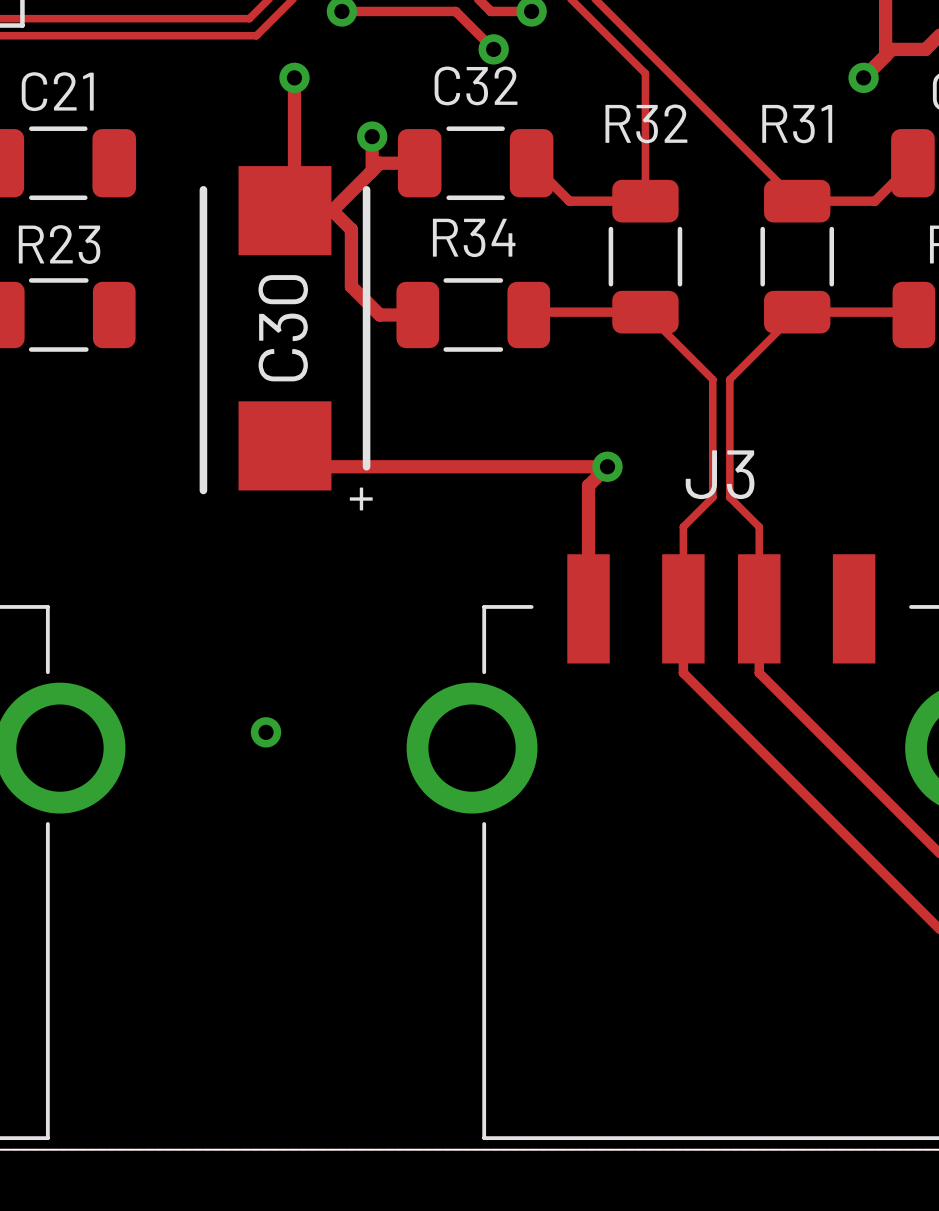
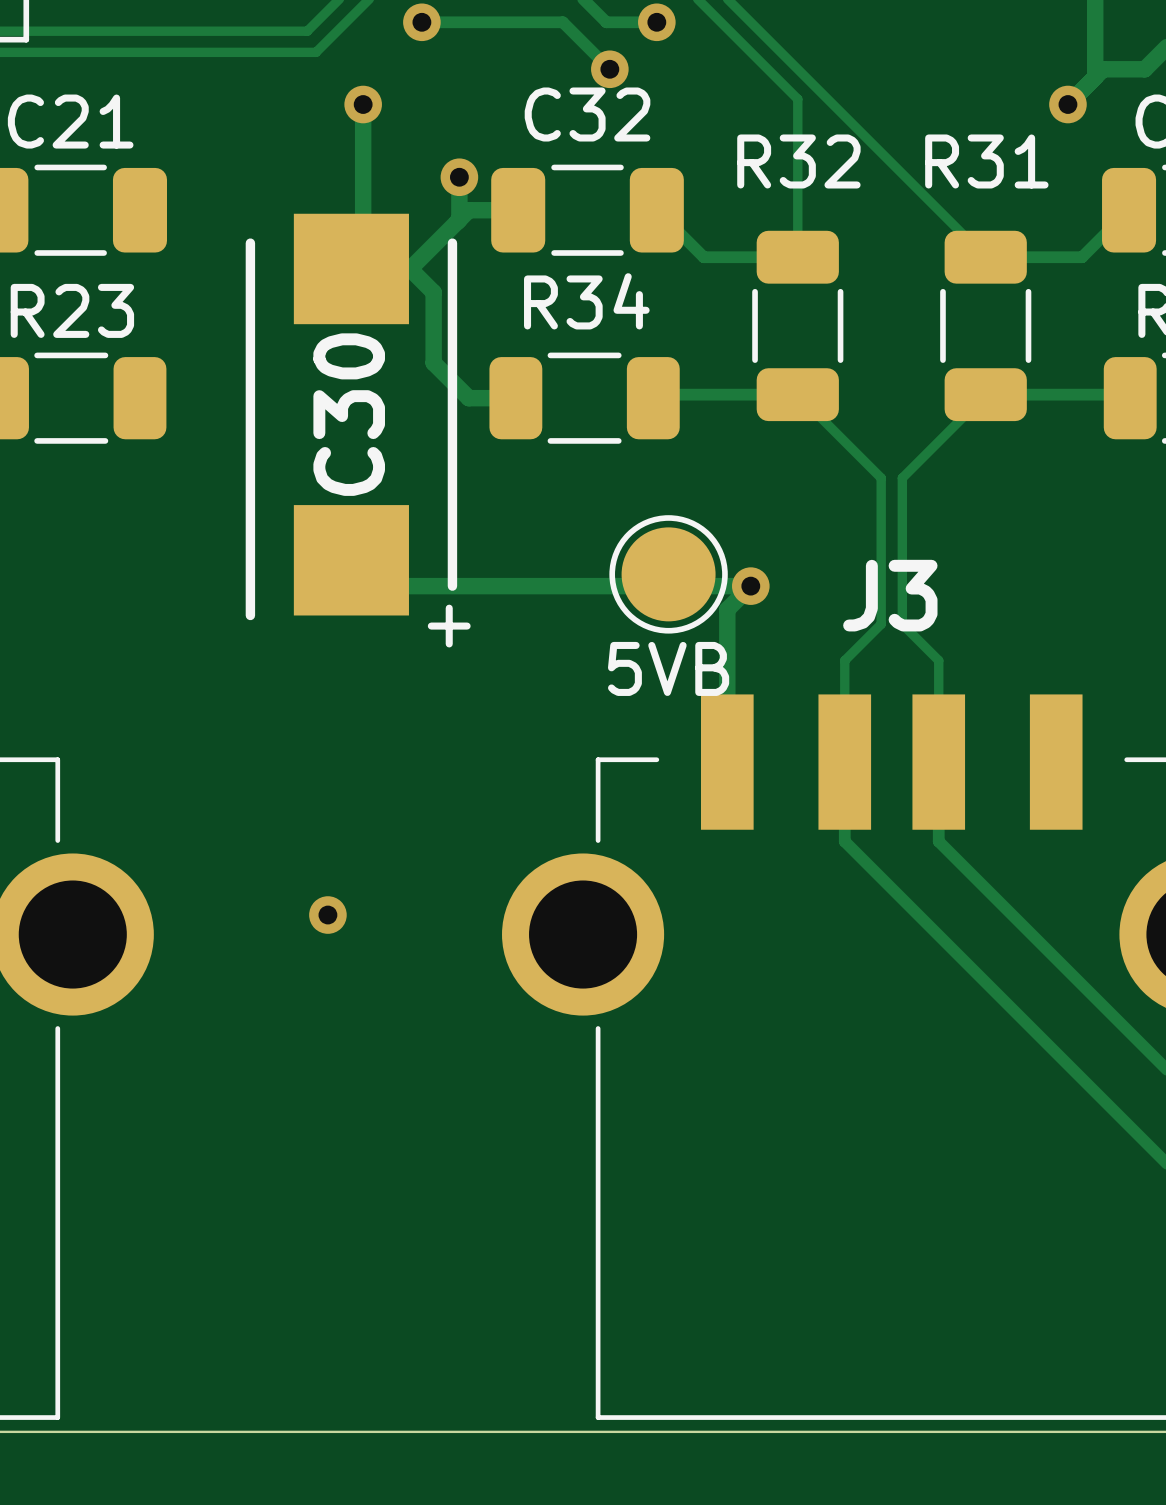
part: none -> 5VB (668, 574)

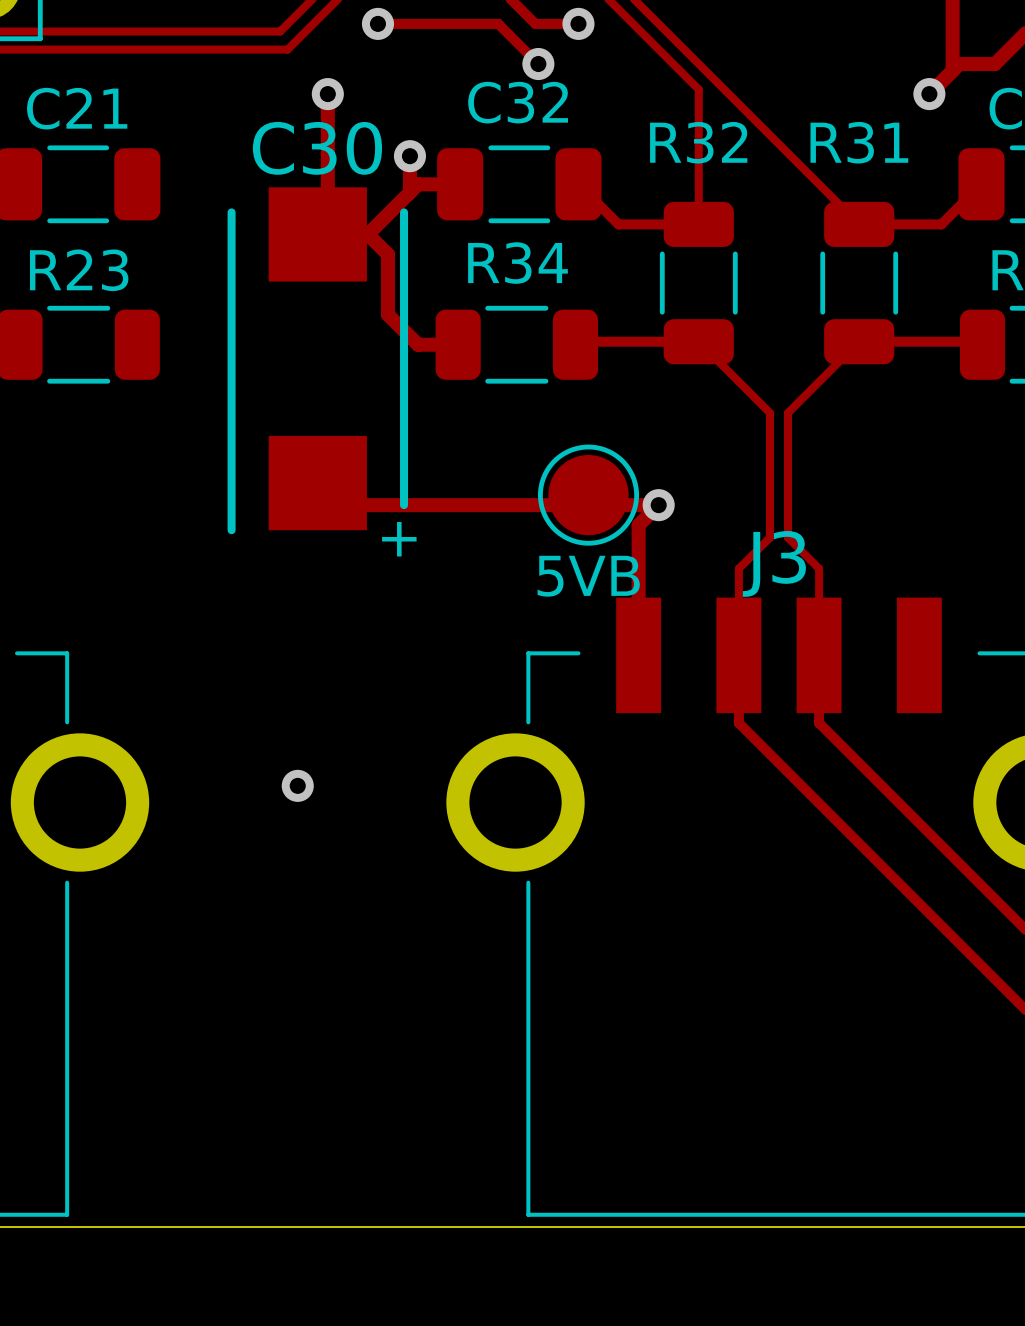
C30 name rotation: 0° (349, 414) -> 90° clockwise (317, 148)
C30 name position: C30 (349, 414) -> C30 (317, 148)
J3 name position: J3 (890, 595) -> J3 (774, 563)

